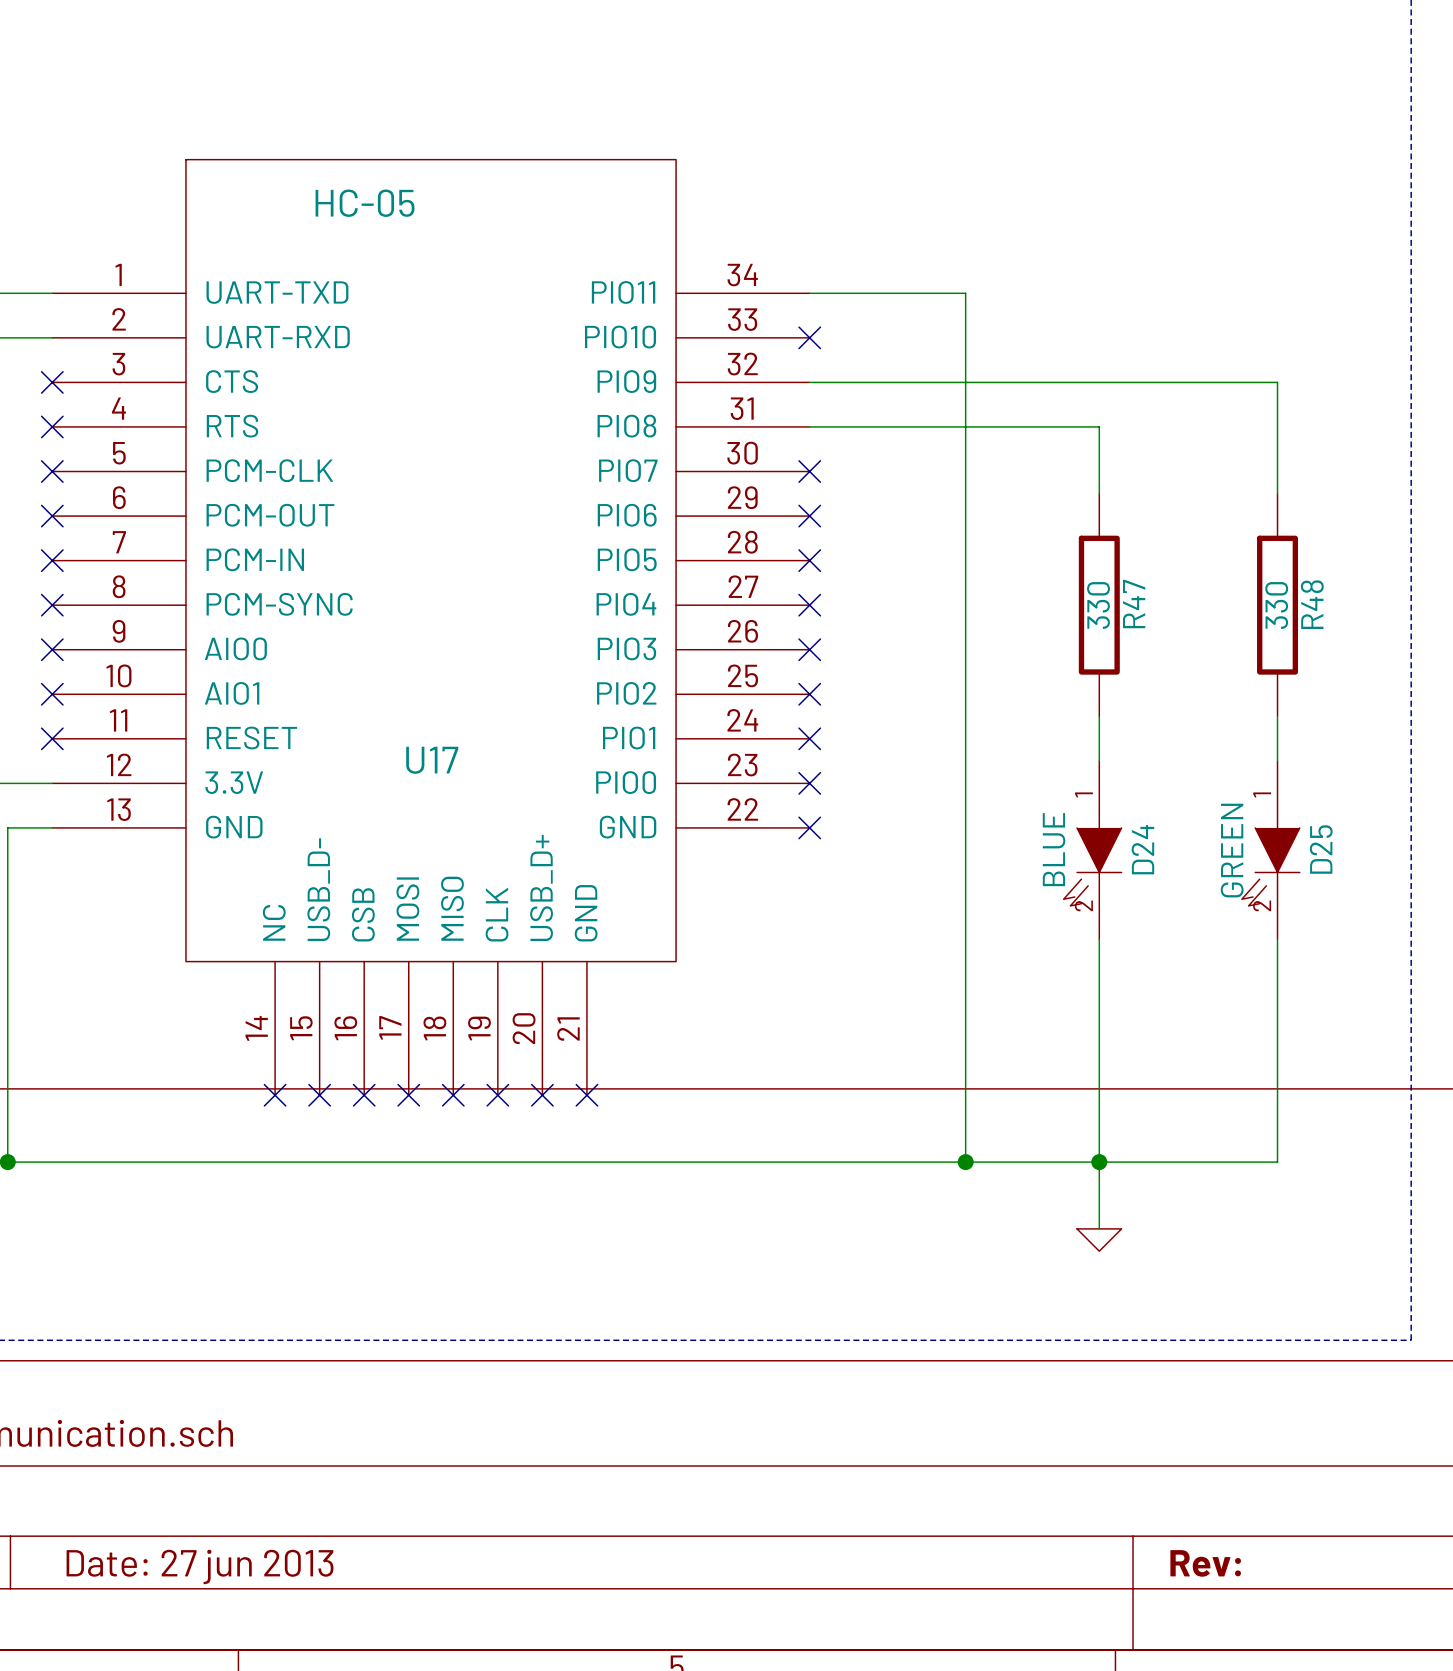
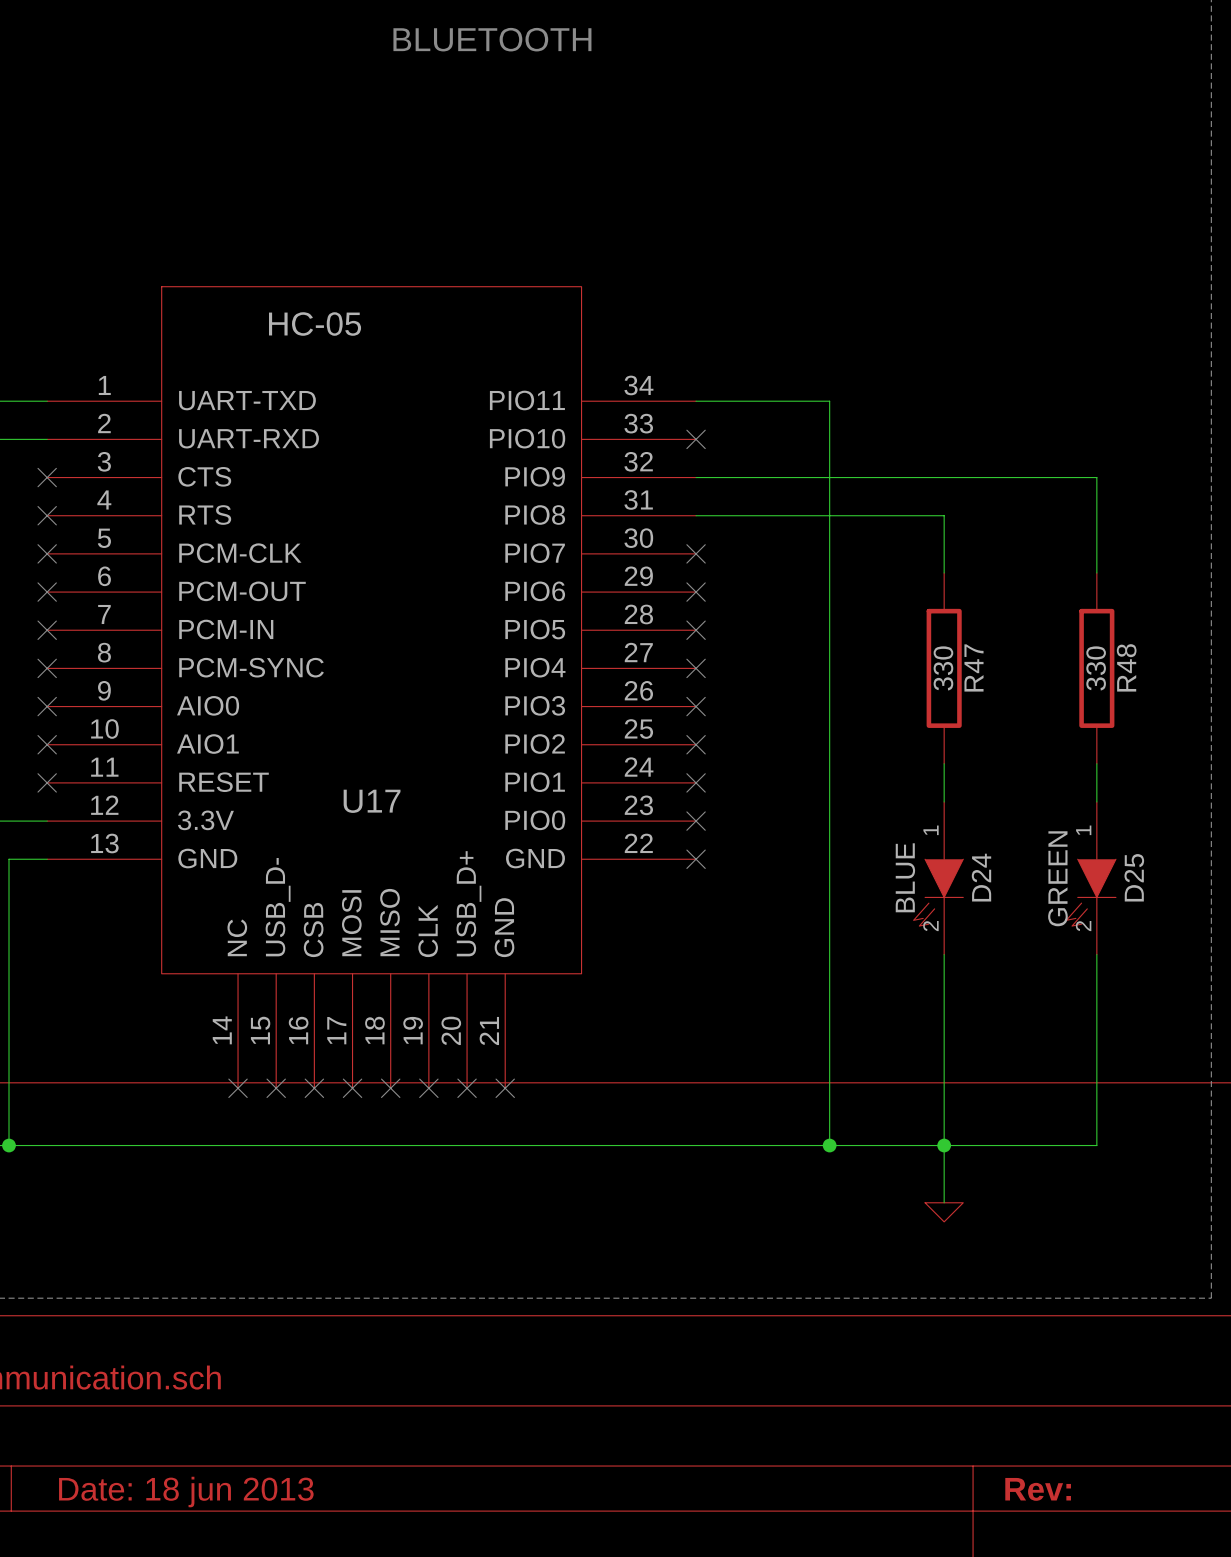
title block: Date: 27 jun 2013 (200, 1566) -> Date: 18 jun 2013 (186, 1492)

